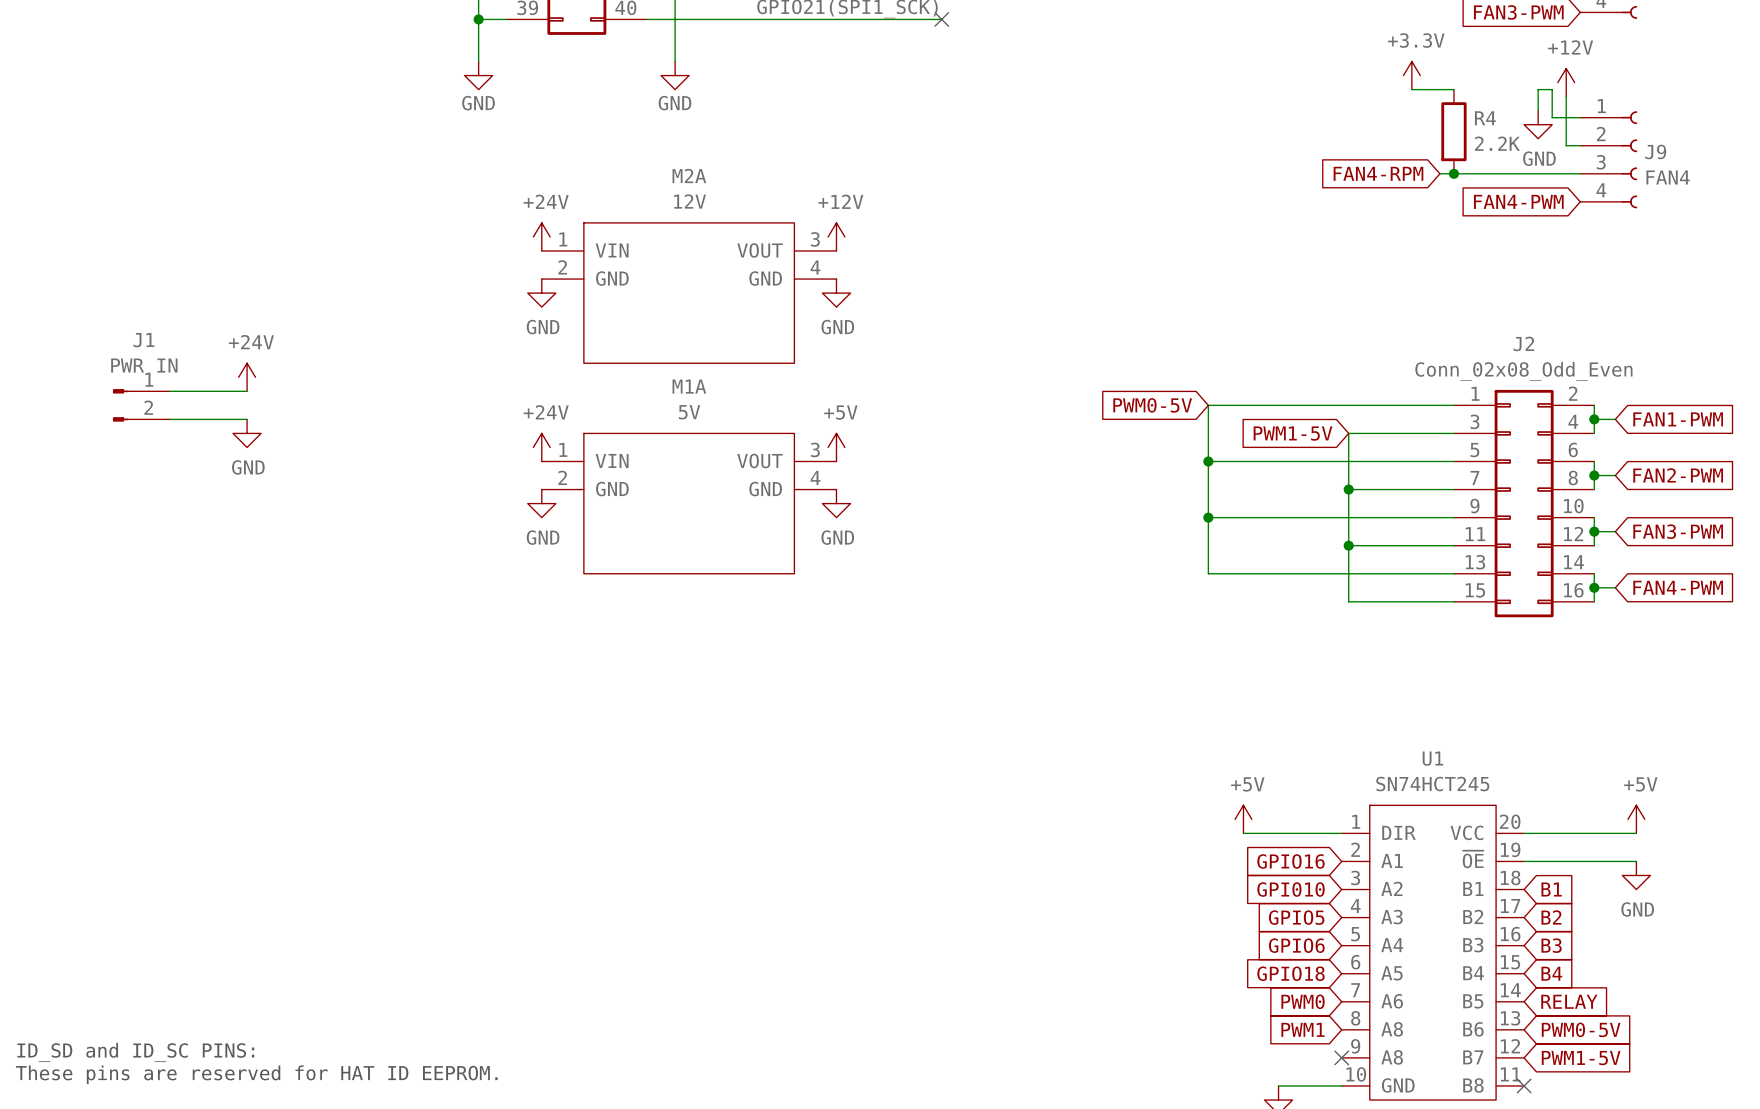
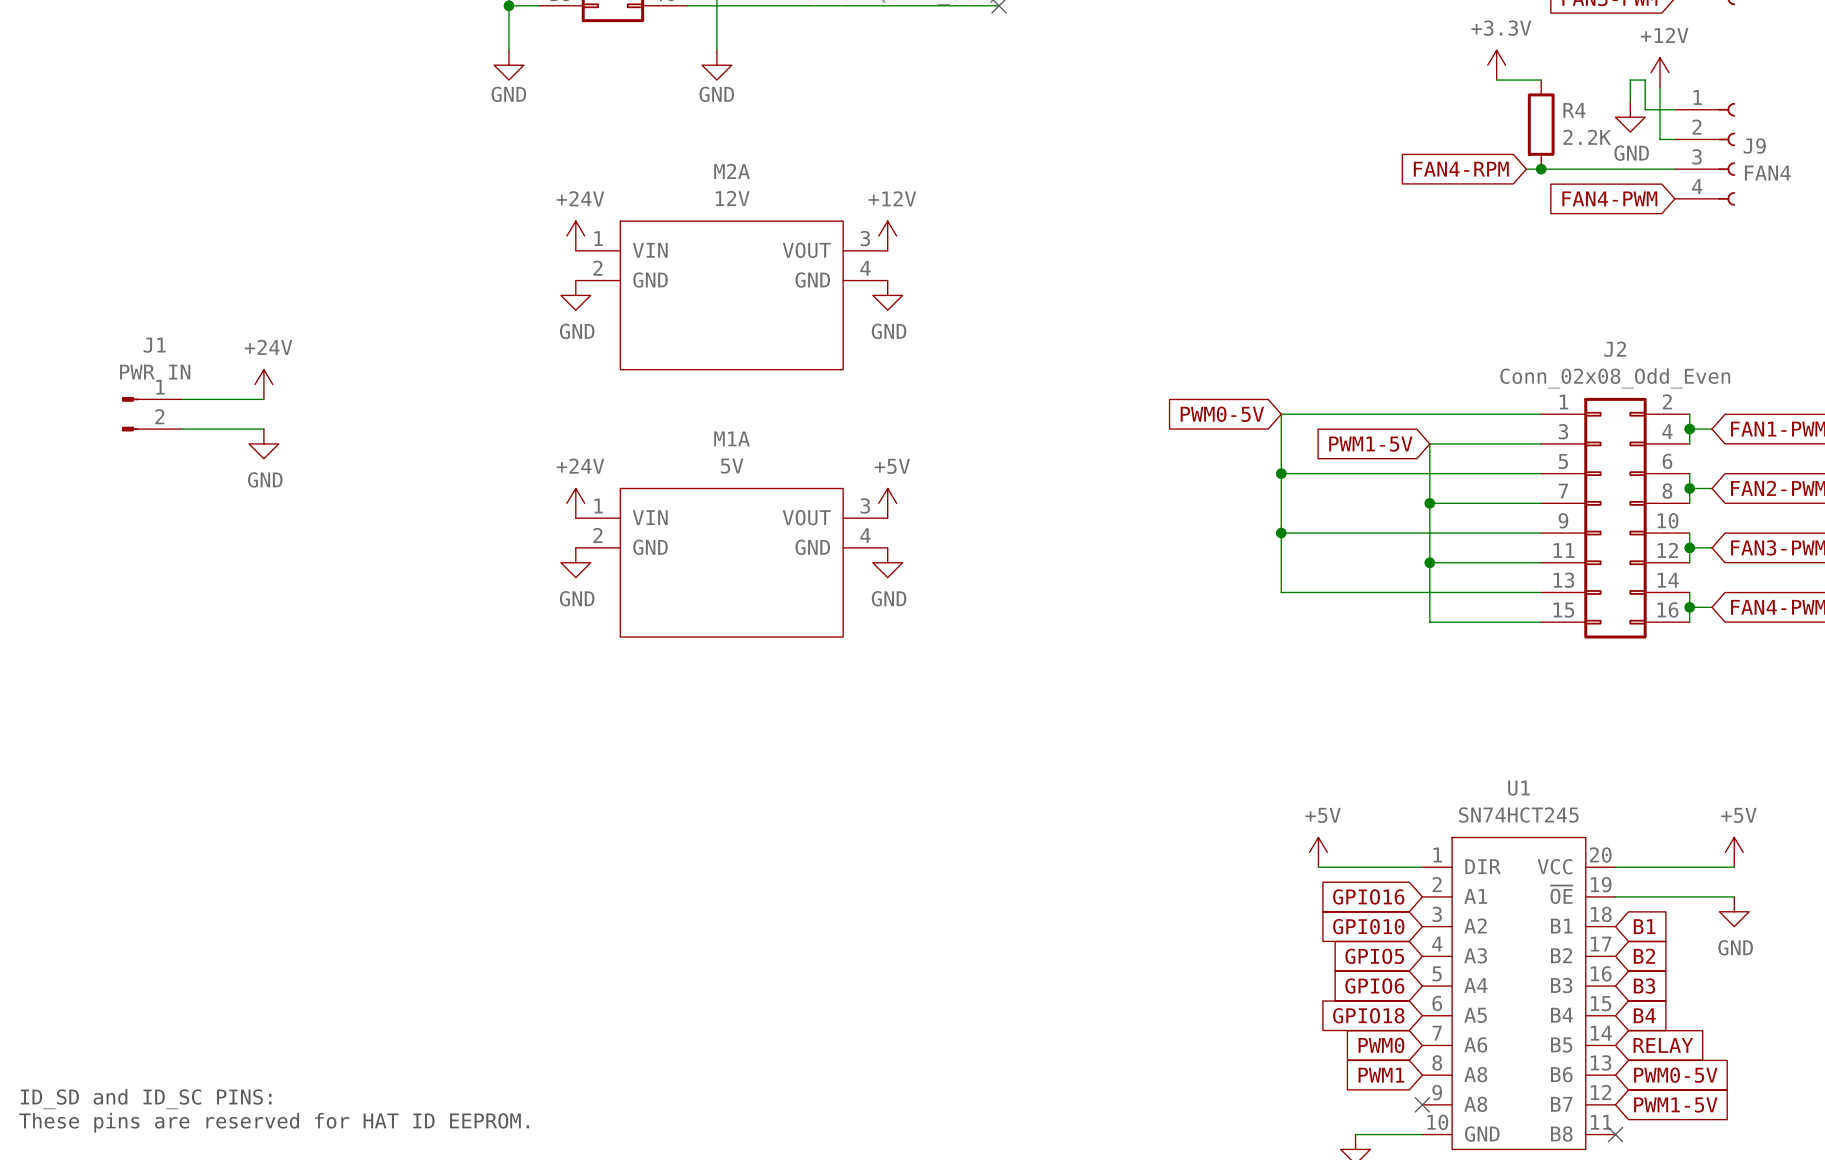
power symbol position: +24V (541, 447) -> +24V (575, 503)
power symbol position: +5V (836, 447) -> +5V (887, 503)
power symbol position: GND (541, 503) -> GND (575, 562)
M1A position: (689, 503) -> (731, 562)
power symbol position: GND (836, 503) -> GND (887, 562)

